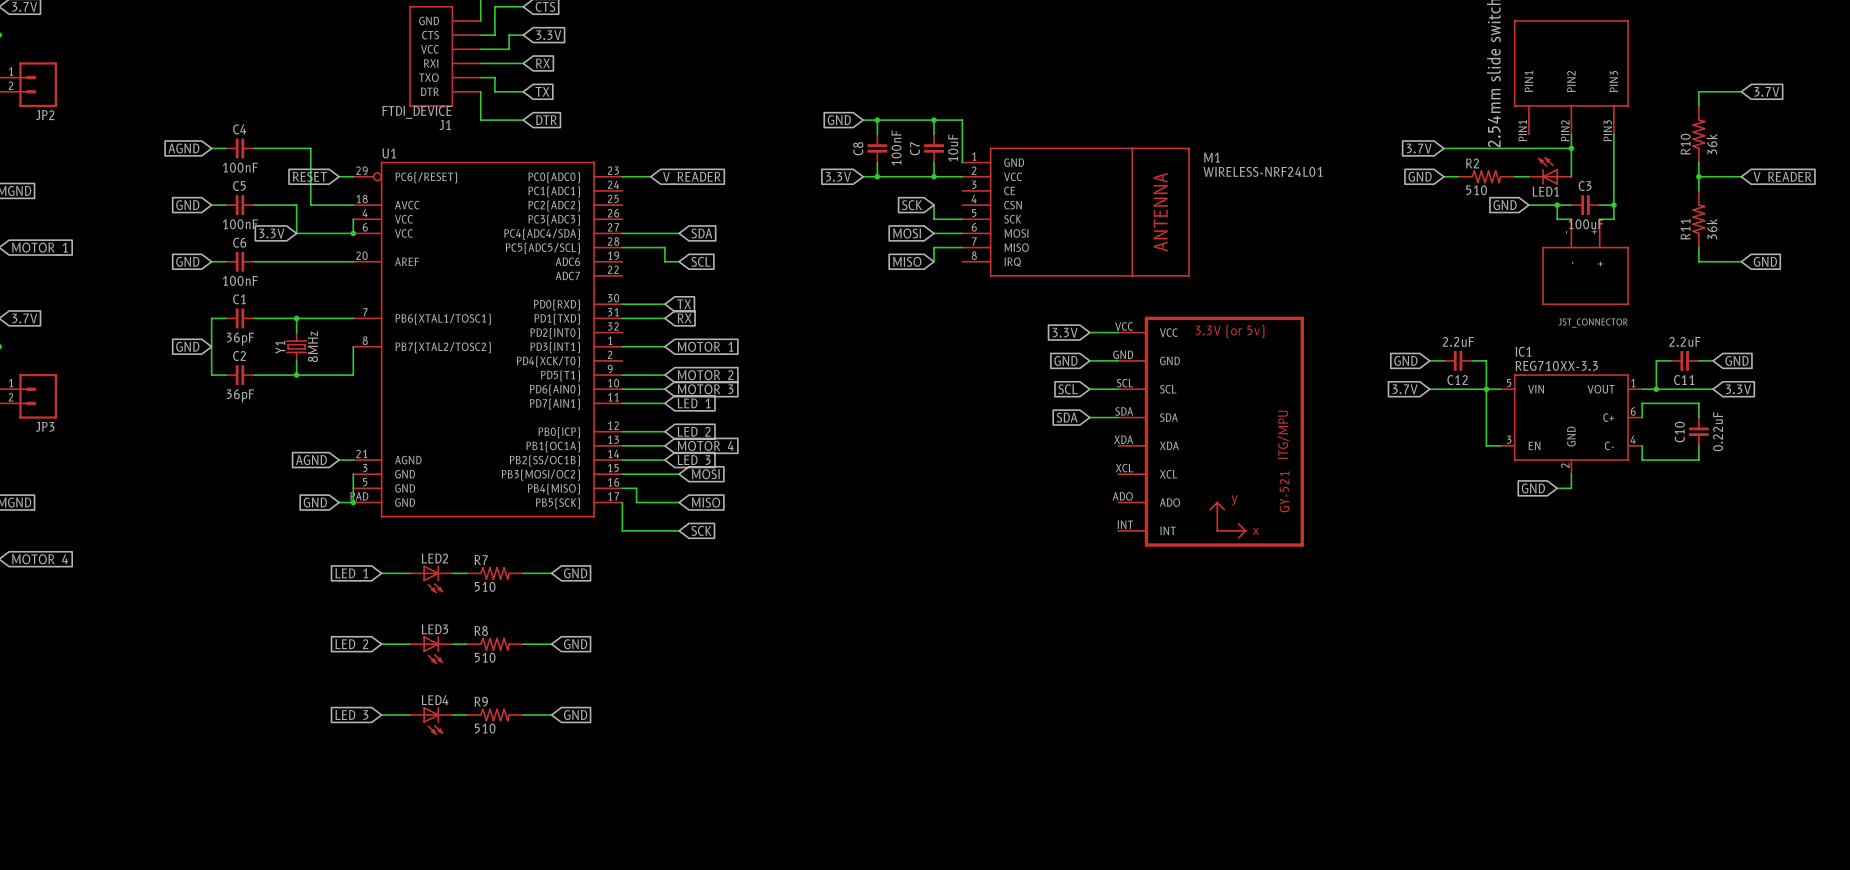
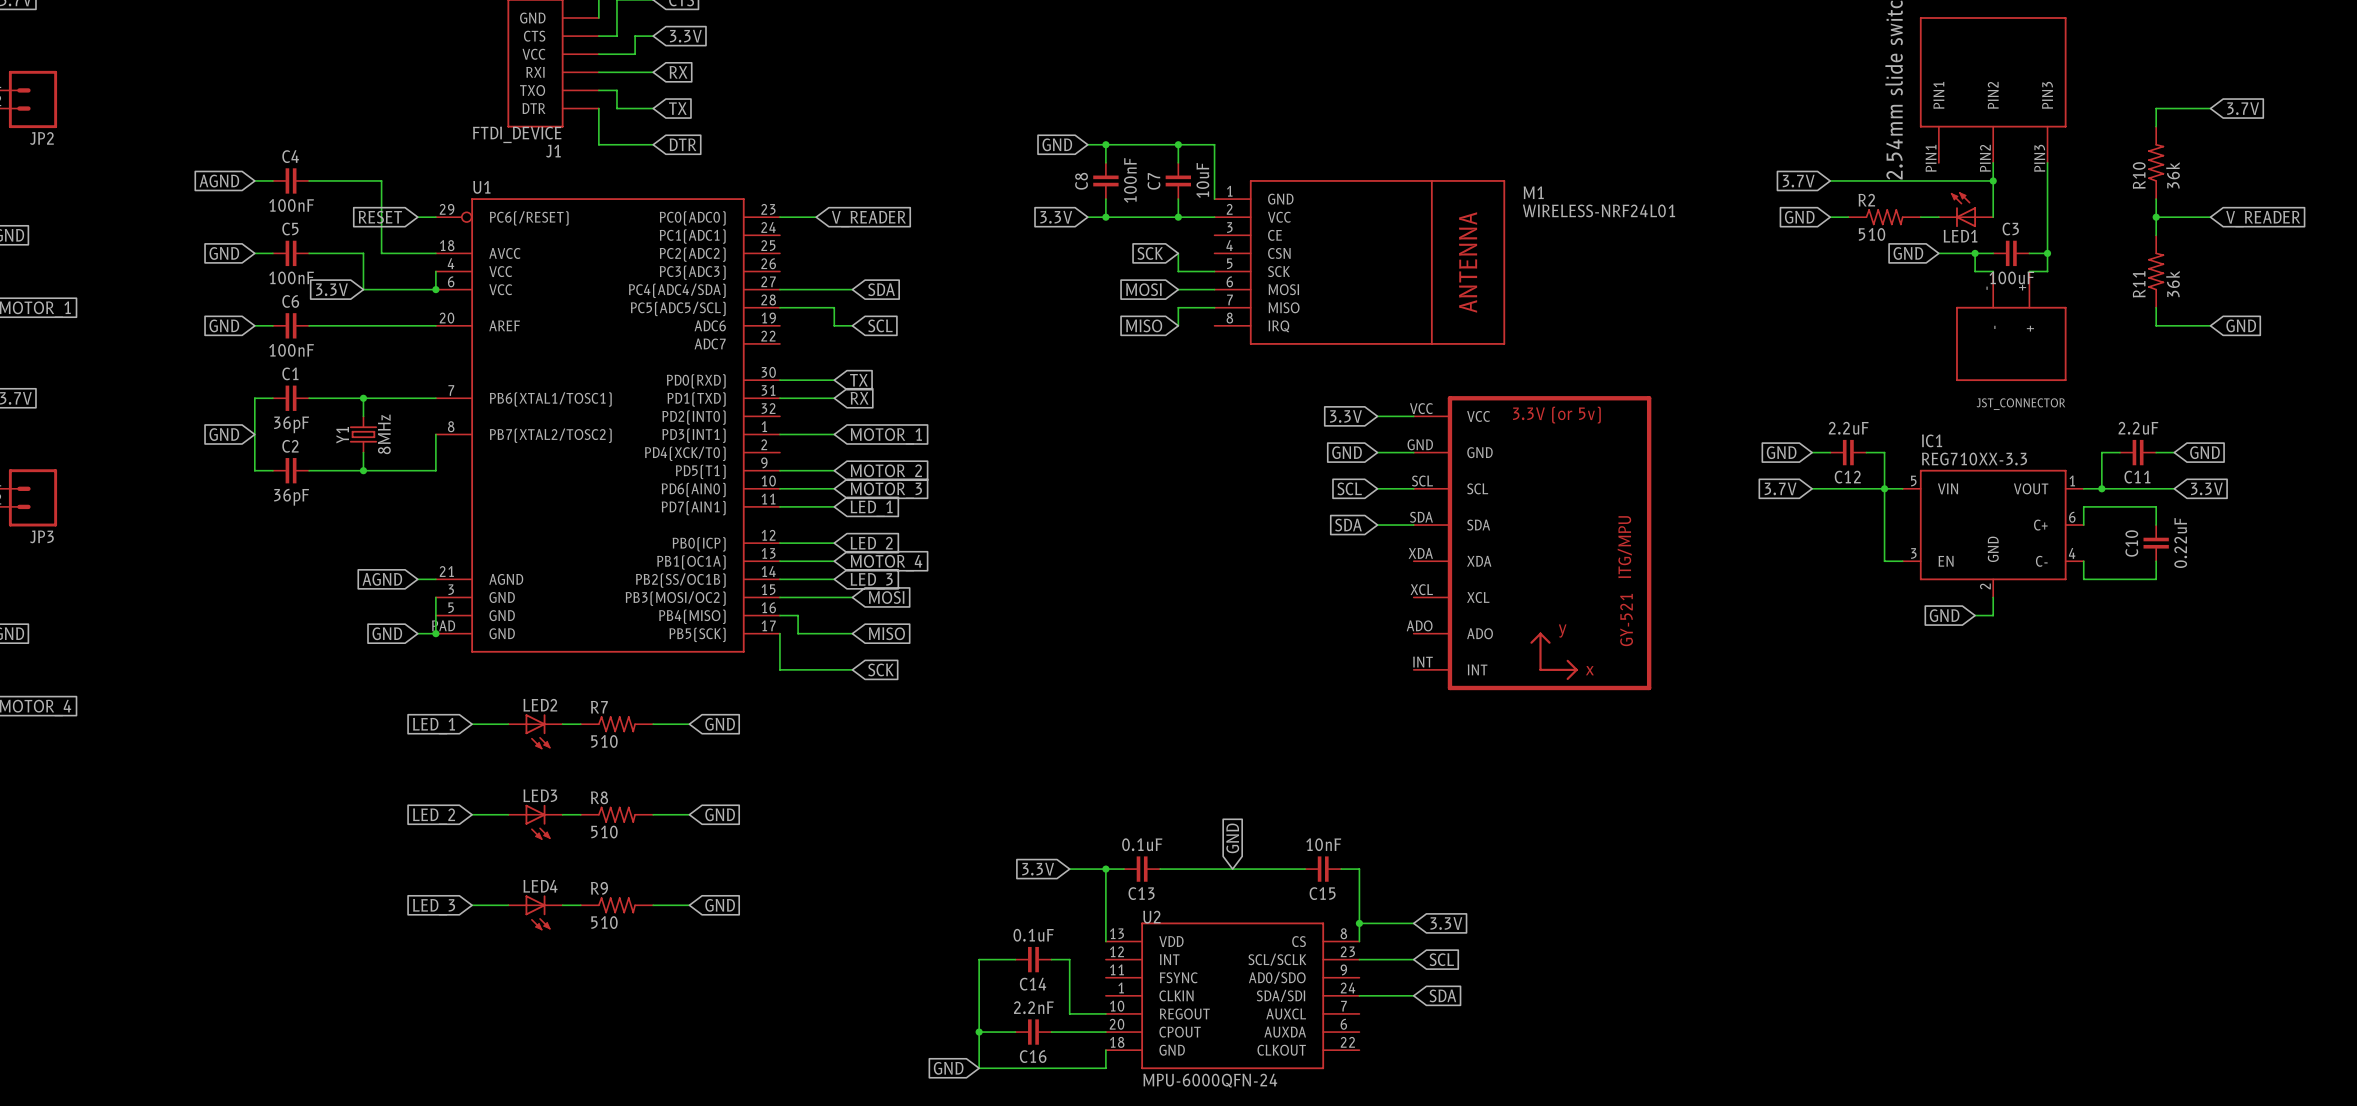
global label: none -> GND (1232, 838)
global label: none -> 3.3V (1038, 869)
wire: none -> (1069, 869) (1124, 869)
wire: none -> (1105, 869) (1105, 941)
junction: none -> (1105, 869)
C13: none -> 0.1uF (1142, 869)
wire: none -> (1160, 869) (1305, 869)
C15: none -> 10nF (1323, 869)
wire: none -> (1341, 869) (1359, 869) (1359, 941)
wire: none -> (1359, 923) (1413, 923)
junction: none -> (1359, 923)
global label: none -> 3.3V (1446, 923)
wire: none -> (1015, 959) (979, 959) (979, 1068) (1105, 1068) (1105, 1050)
C14: none -> 0.1uF (1033, 959)
wire: none -> (1051, 959) (1069, 959) (1069, 1013) (1105, 1013)
wire: none -> (1359, 959) (1413, 959)
global label: none -> SCL (1441, 959)
U2: none -> MPU-6000QFN-24 (1232, 995)
wire: none -> (1359, 995) (1413, 995)
global label: none -> SDA (1442, 995)
wire: none -> (979, 1032) (1015, 1032)
junction: none -> (979, 1032)
C16: none -> 2.2nF (1033, 1032)
wire: none -> (1051, 1032) (1105, 1032)
global label: none -> GND (948, 1068)

